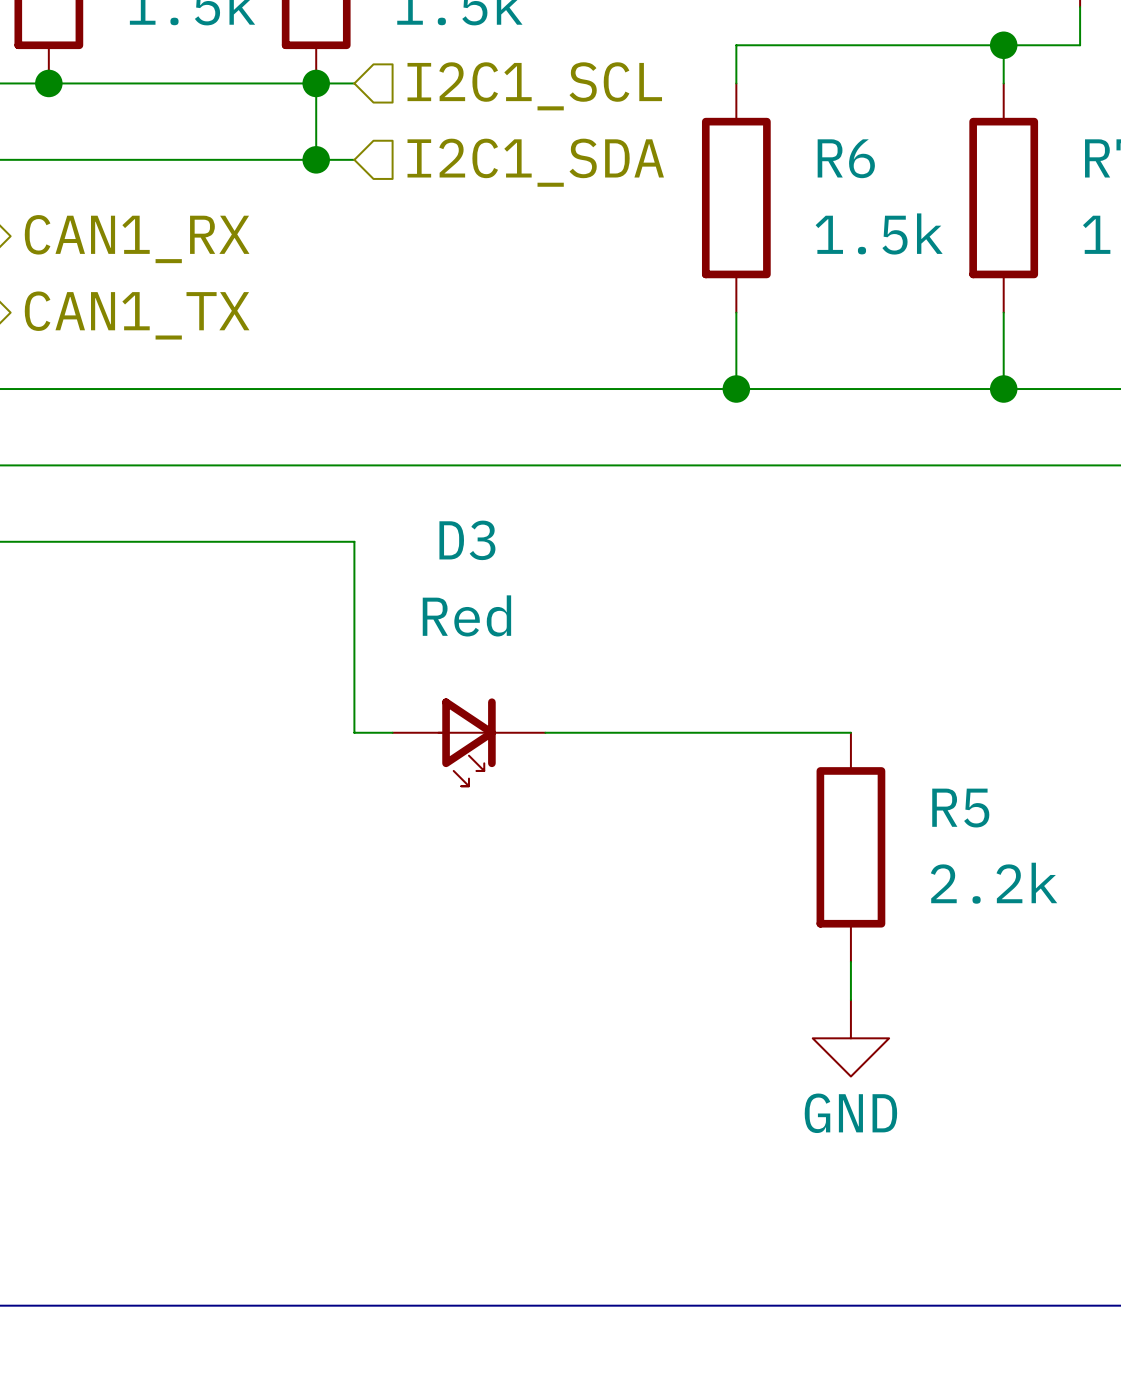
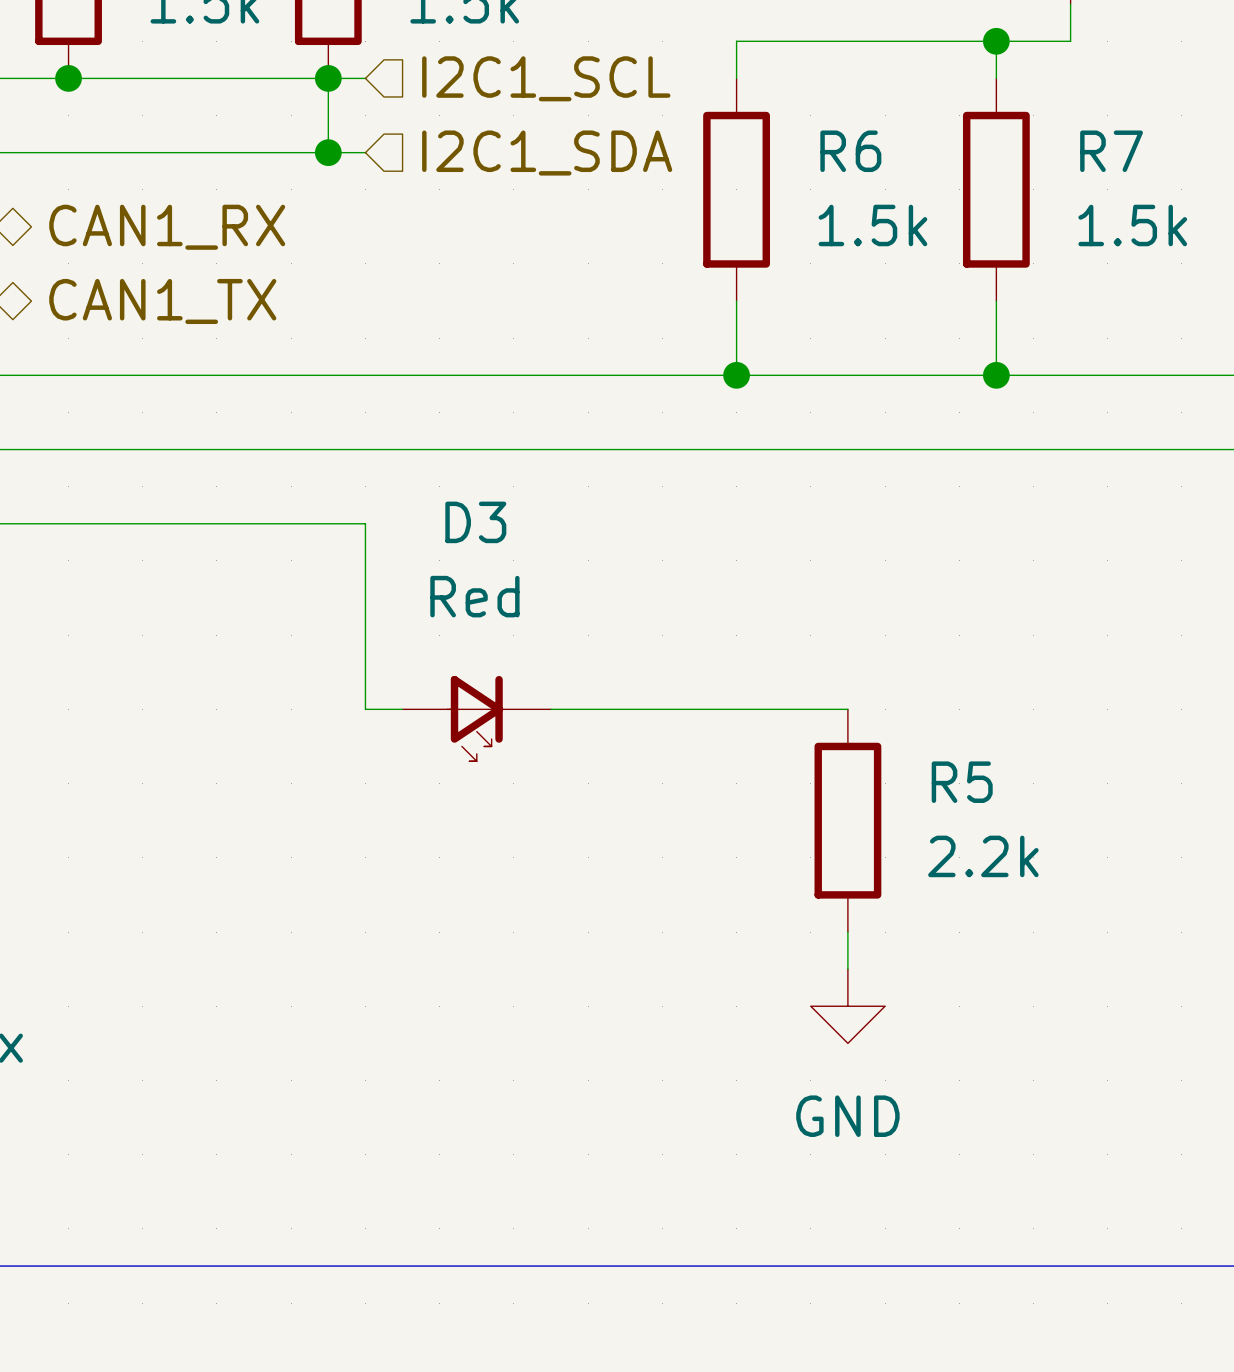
power symbol text position: GND (850, 1113) -> GND (847, 1116)

